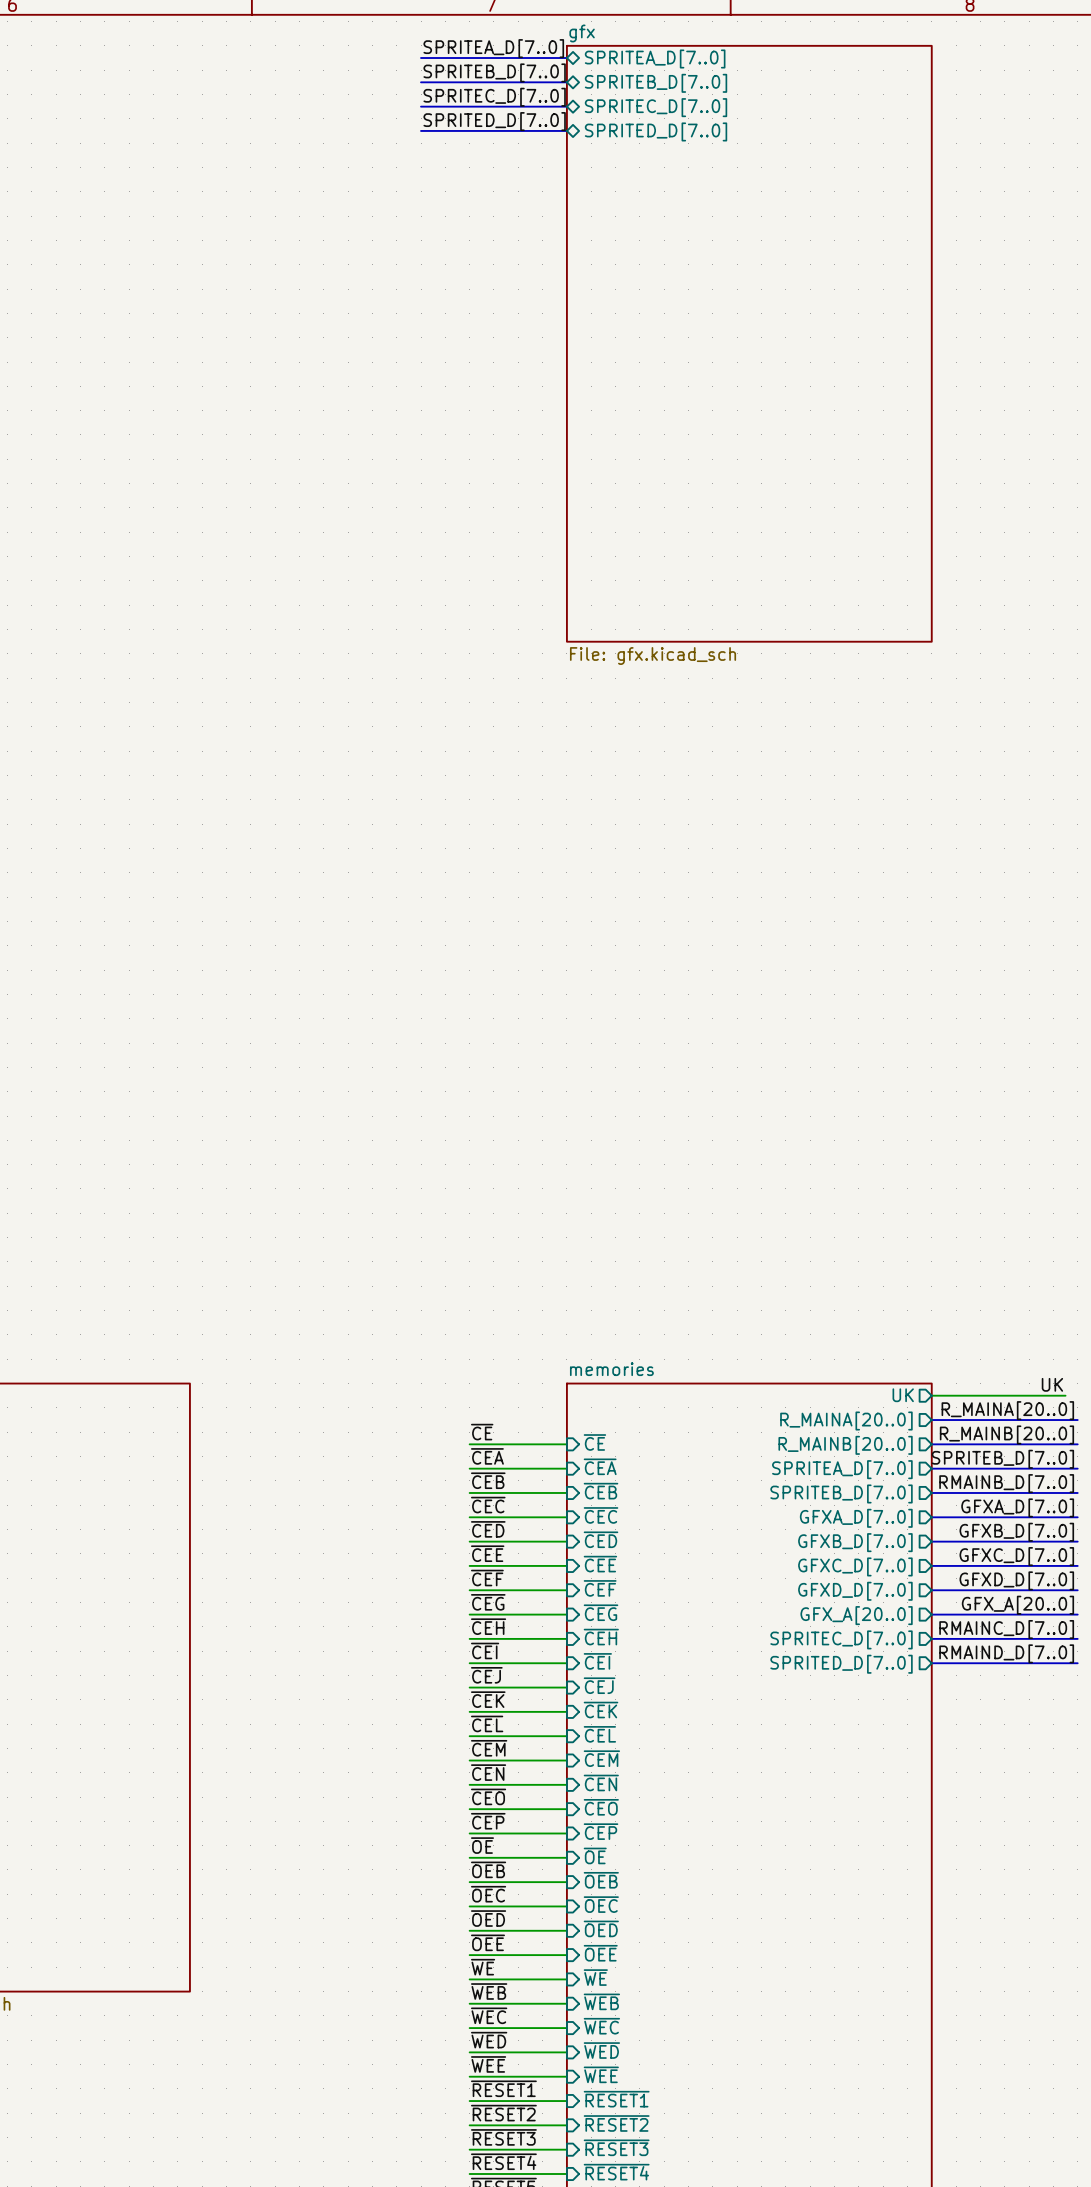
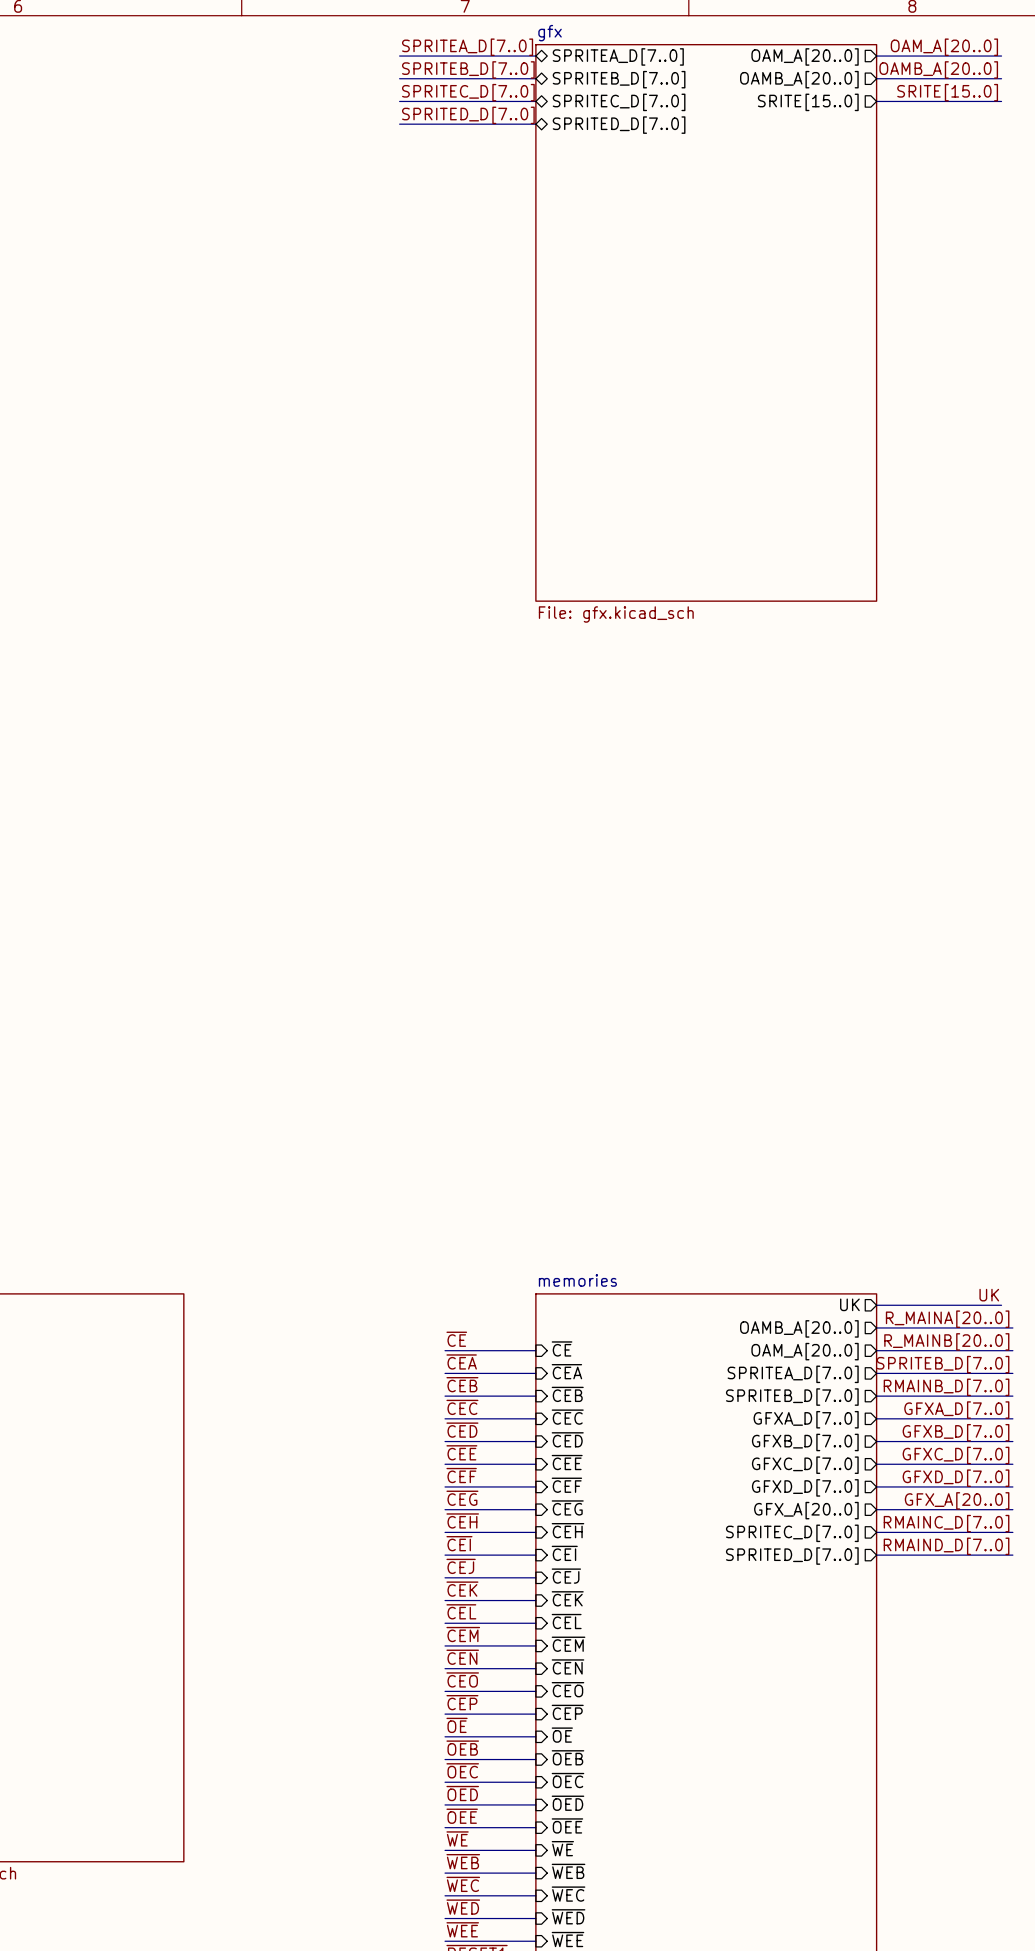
label: none -> OAM_A[20..0] (944, 47)
sheet pin: none -> OAM_A[20..0] (805, 56)
bus: none -> (876, 56) (1001, 56)
label: none -> OAMB_A[20..0] (938, 69)
bus: none -> (876, 78) (1001, 78)
sheet pin: none -> OAMB_A[20..0] (799, 79)
label: none -> SRITE[15..0] (947, 92)
bus: none -> (876, 101) (1001, 101)
sheet pin: none -> SRITE[15..0] (808, 102)
sheet pin: R_MAINA[20..0] (846, 1421) -> OAMB_A[20..0] (799, 1328)
sheet pin: R_MAINB[20..0] (845, 1445) -> OAM_A[20..0] (805, 1351)

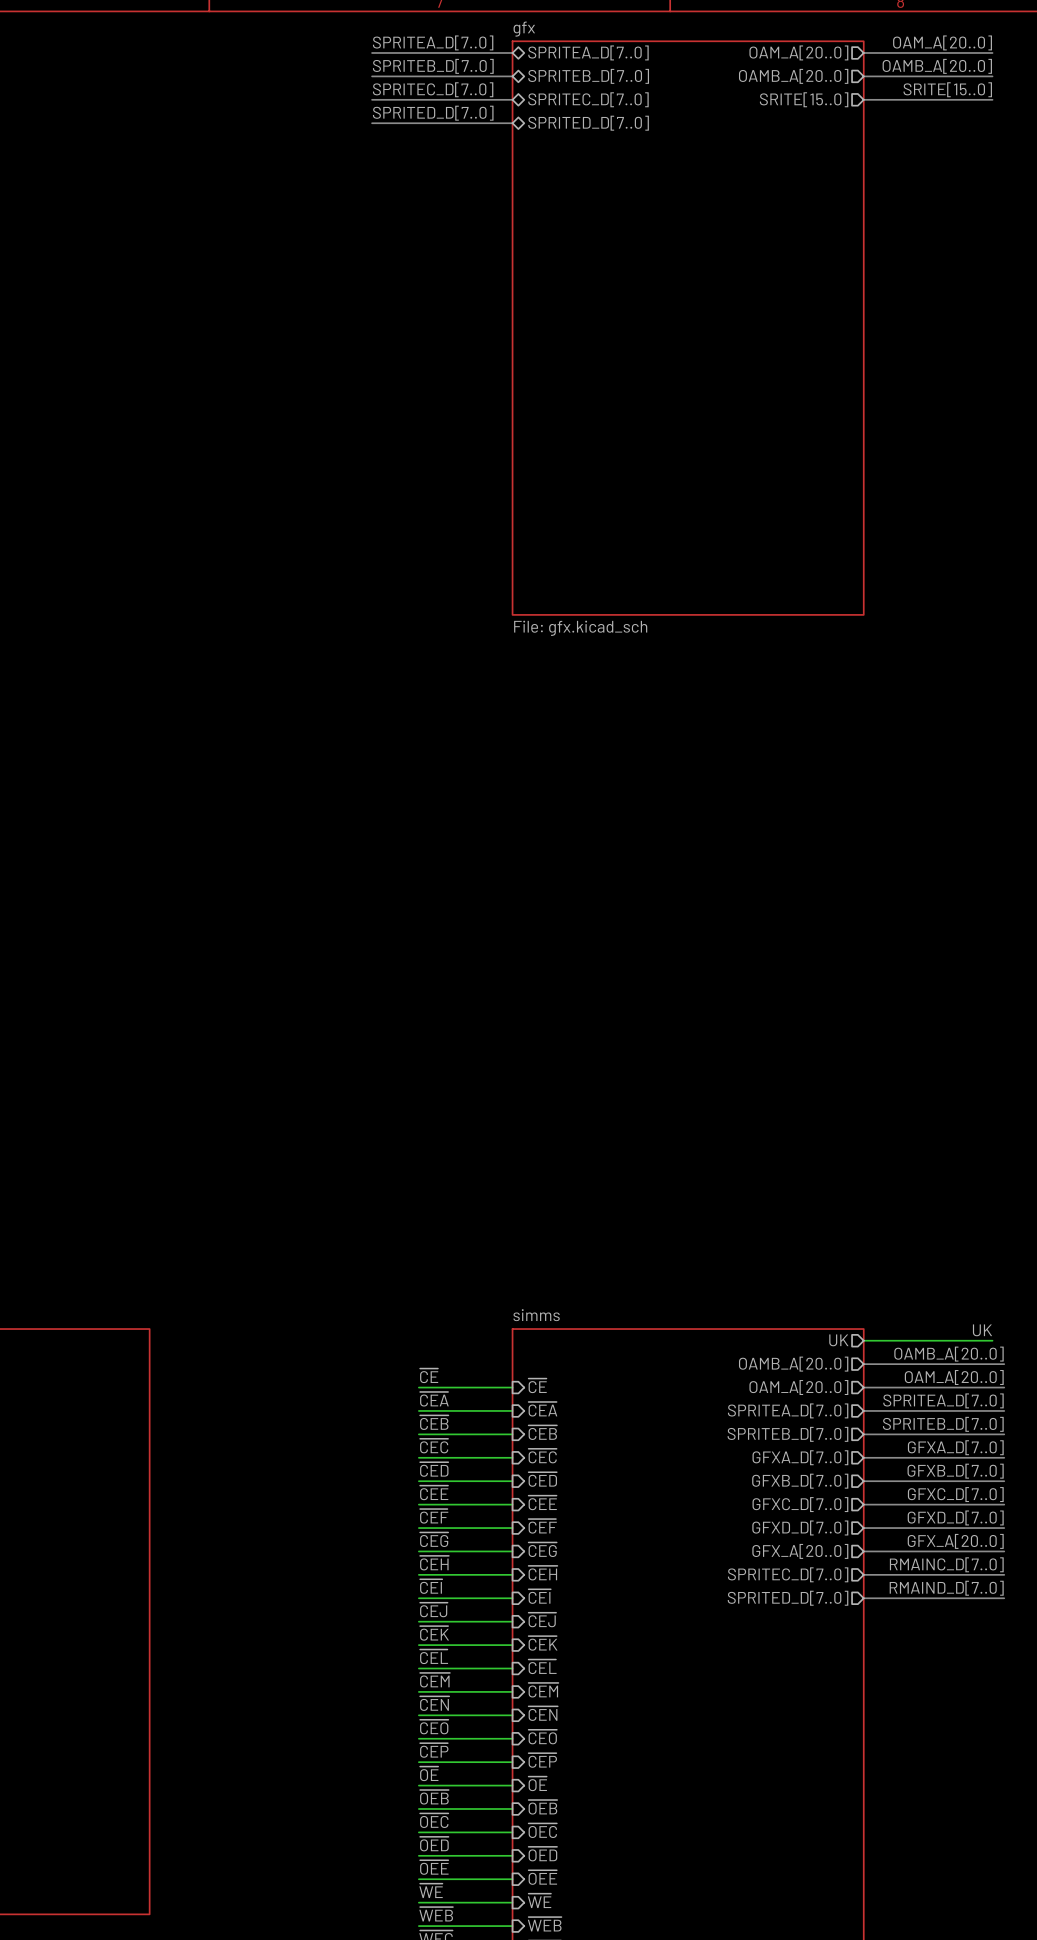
sheet memories name: memories (577, 1280) -> simms (536, 1315)
label: R_MAINA[20..0] (947, 1319) -> OAMB_A[20..0] (949, 1354)
label: R_MAINB[20..0] (946, 1341) -> OAM_A[20..0] (954, 1377)
label: SPRITEB_D[7..0] (943, 1364) -> SPRITEA_D[7..0] (943, 1400)
label: RMAINB_D[7..0] (946, 1387) -> SPRITEB_D[7..0] (943, 1424)

